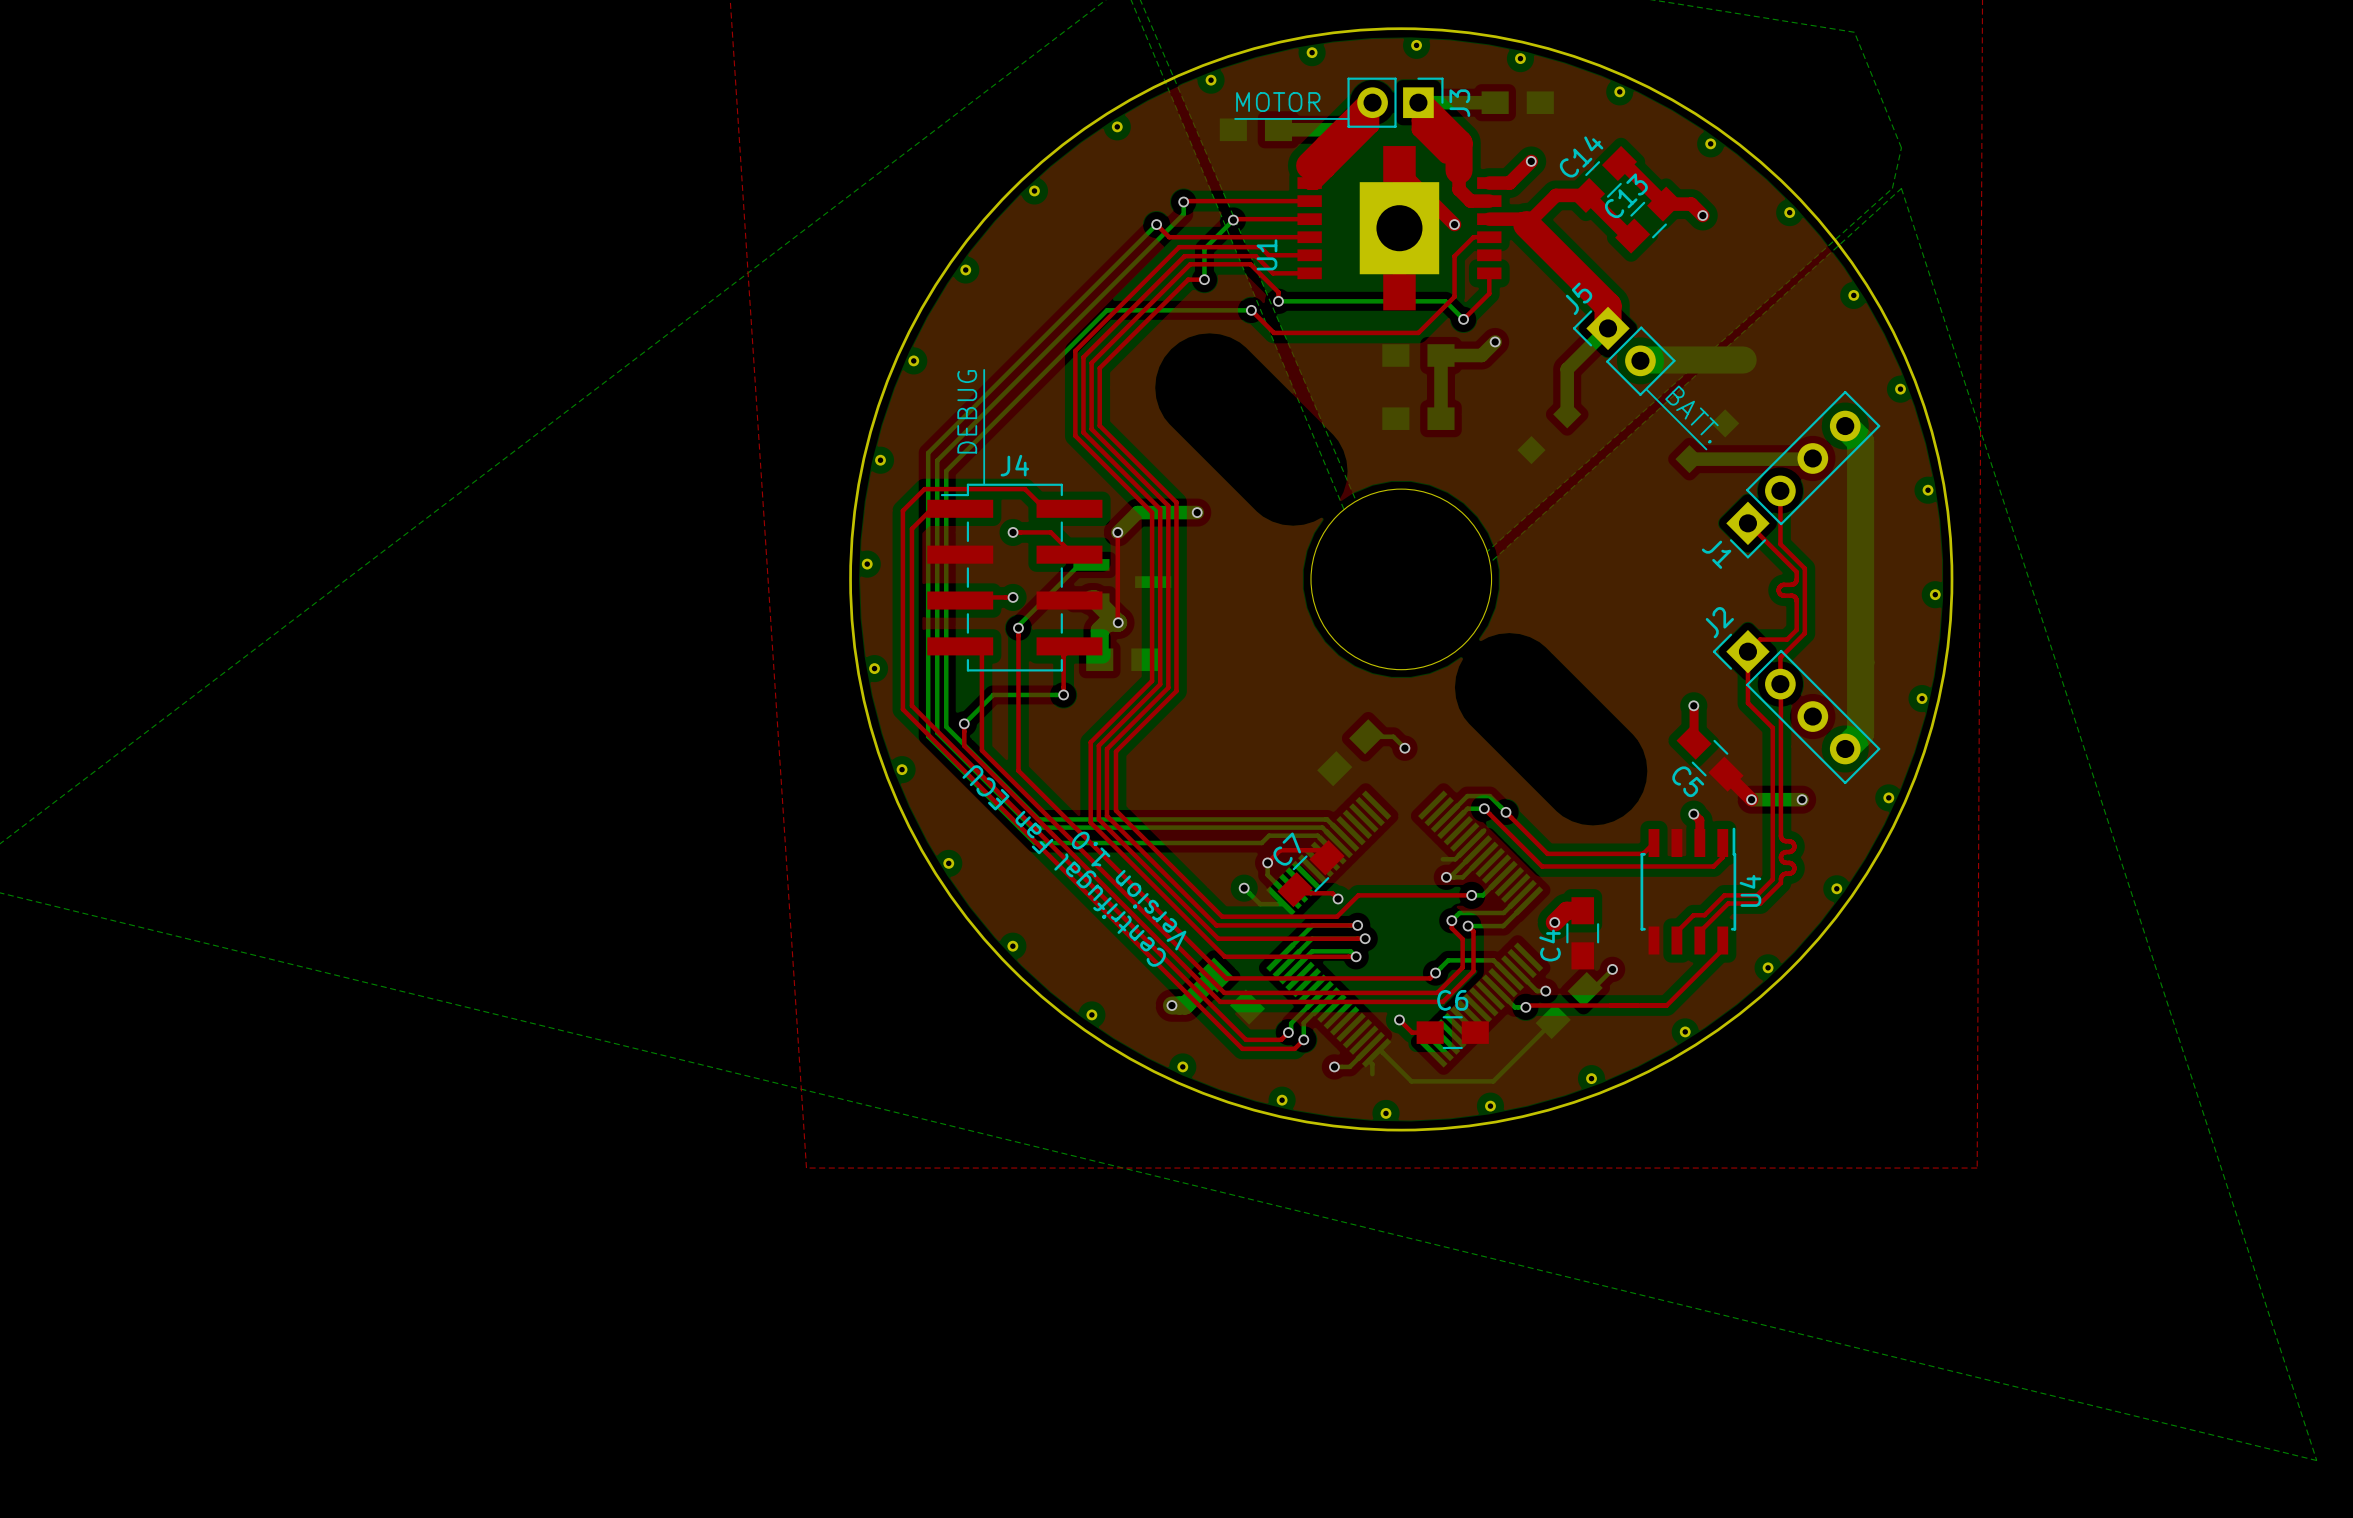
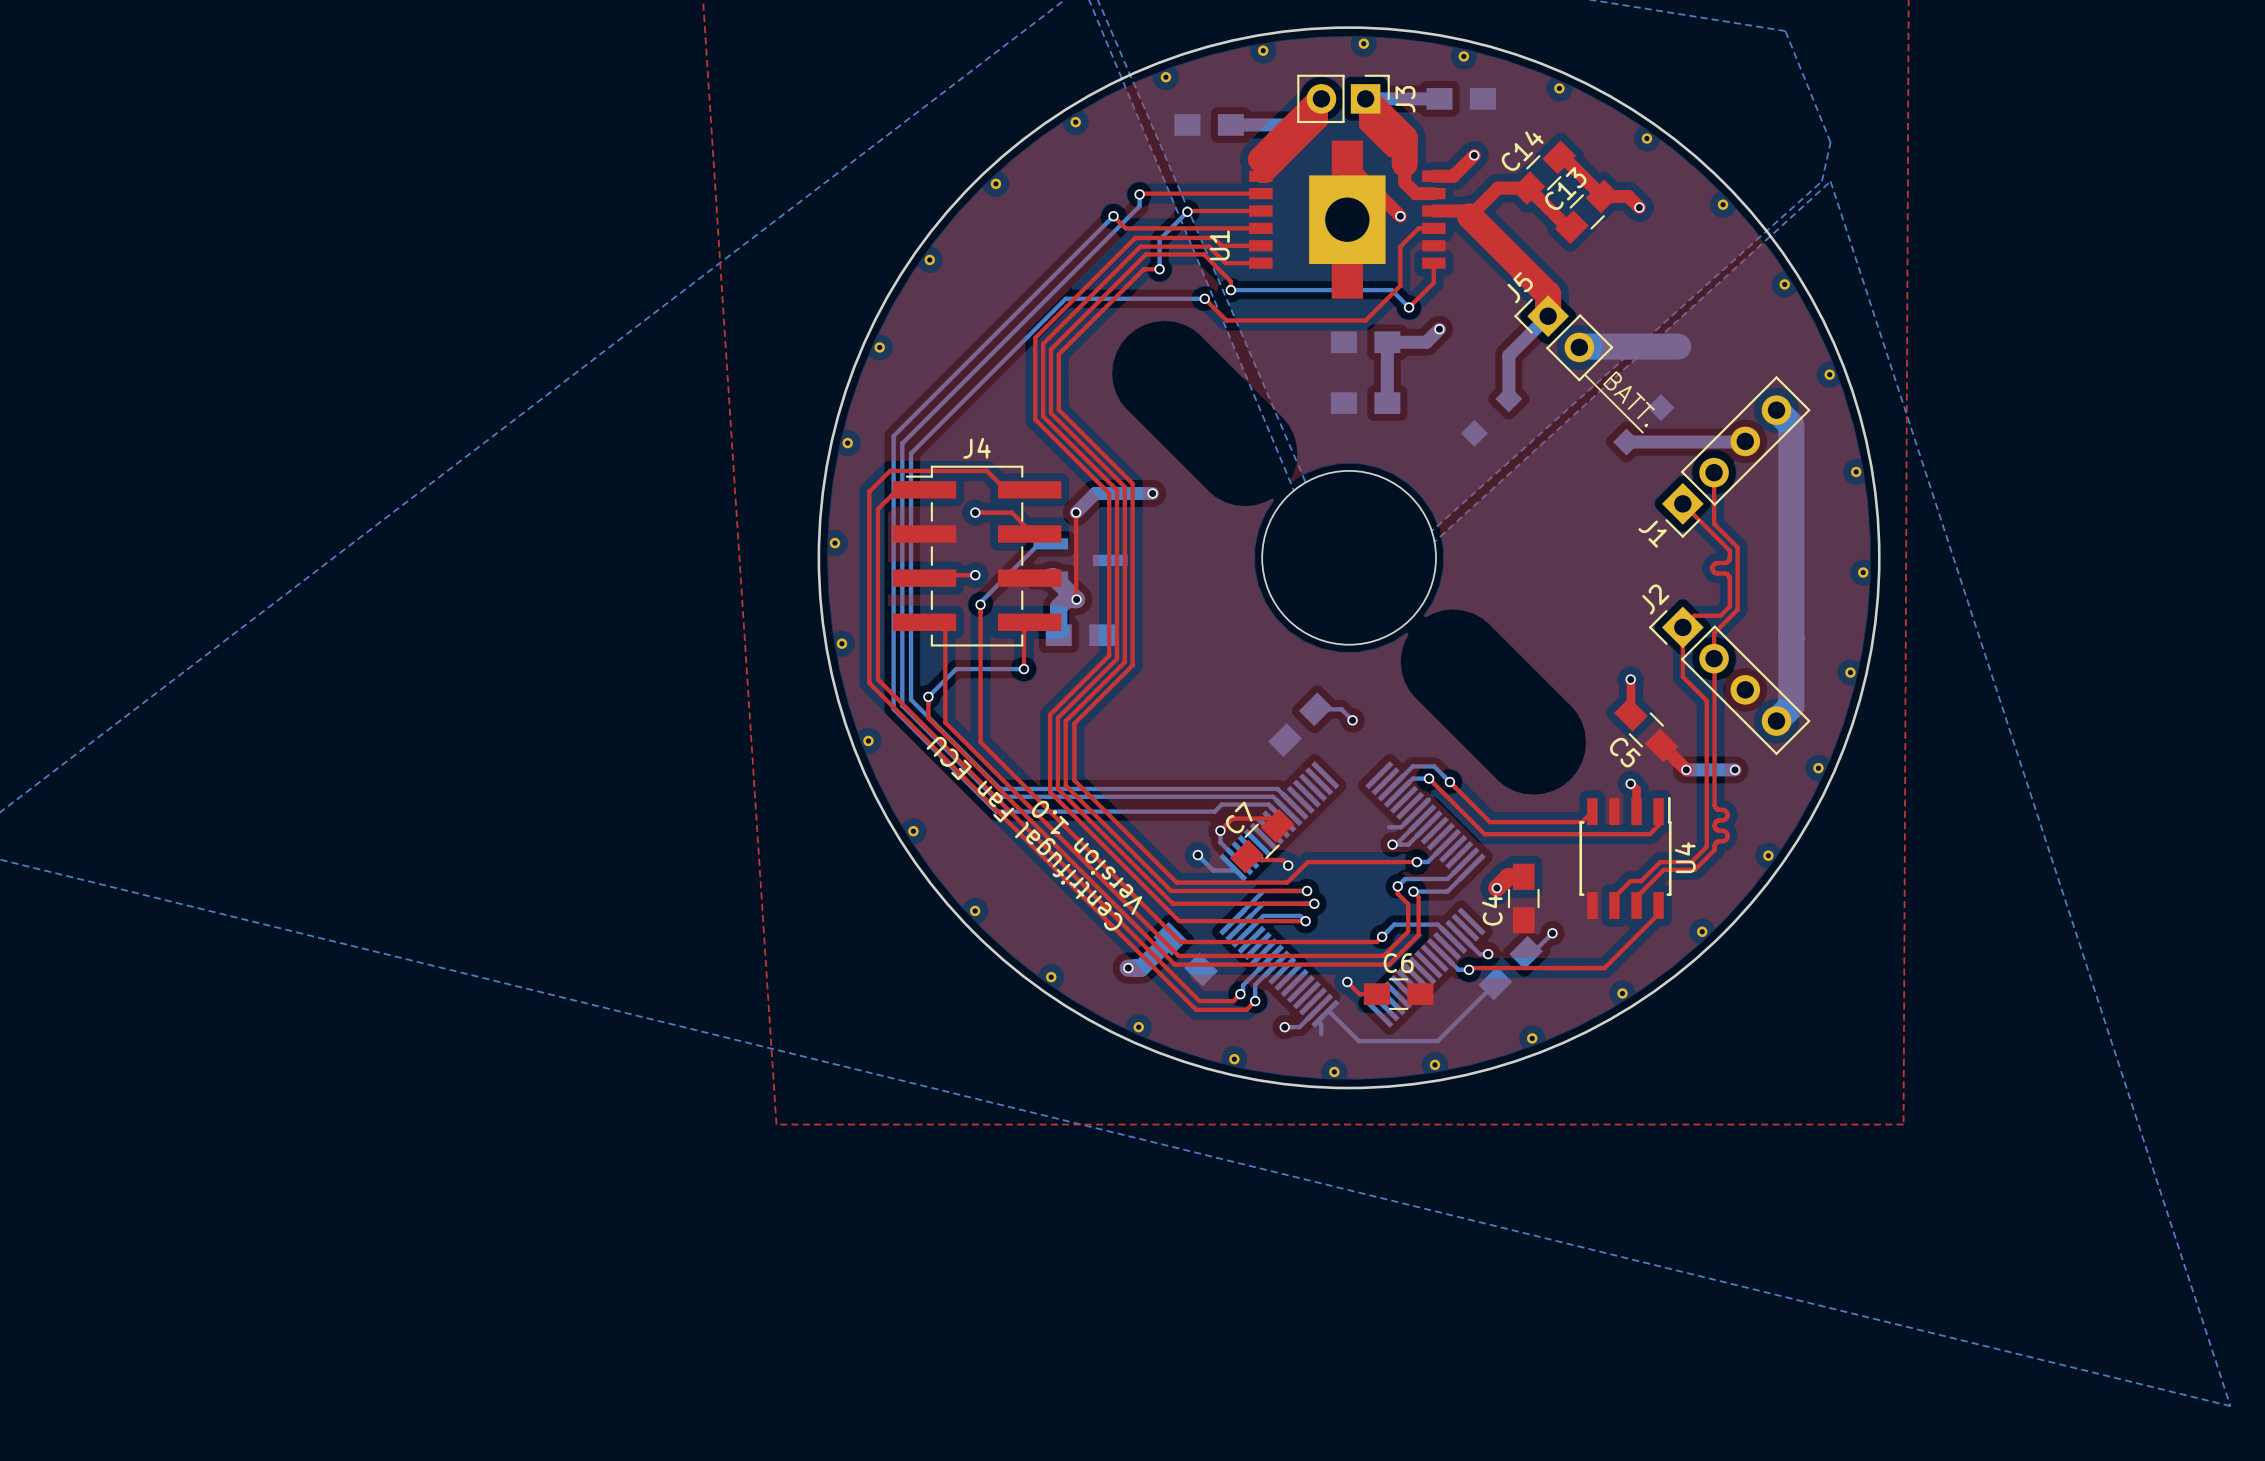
text: MOTOR (1278, 102) -> none
line: (1235, 118) (1348, 118) -> none
line: (984, 369) (984, 483) -> none
text: DEBUG (967, 411) -> none

